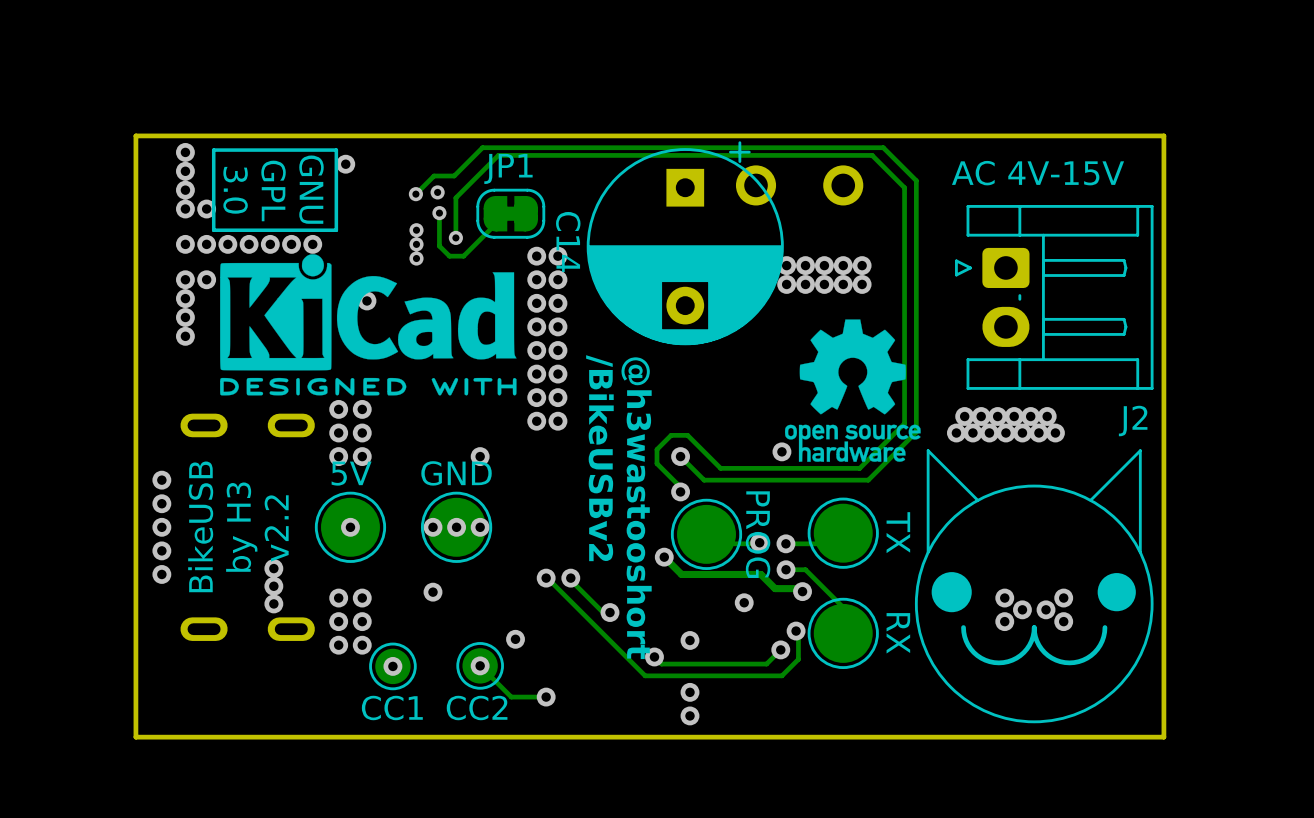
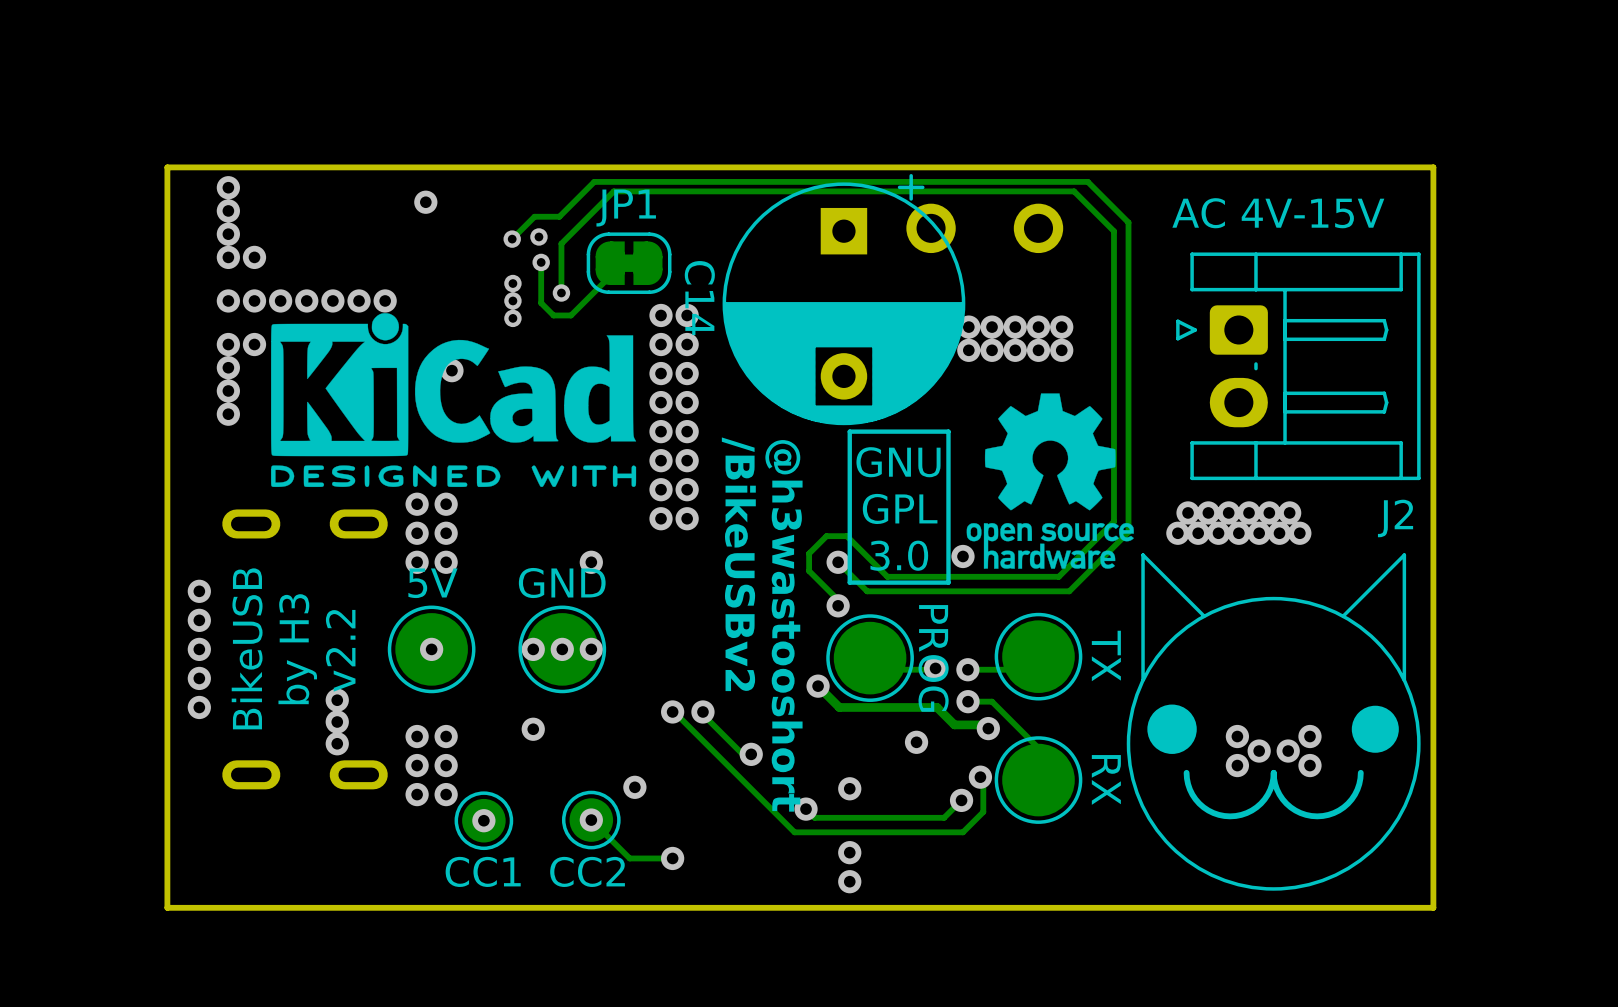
line: (336, 150) (213, 150) (213, 230) (336, 230) (336, 150) -> none
text rotation: 0° (311, 189) -> 90° counterclockwise (898, 462)
text position: GNU (311, 189) -> GNU (898, 462)
text rotation: 0° (235, 190) -> 90° counterclockwise (899, 555)
text position: 3.0 (235, 190) -> 3.0 (899, 555)
text rotation: 0° (273, 190) -> 90° counterclockwise (900, 508)
text position: GPL (273, 190) -> GPL (900, 508)
line: none -> (948, 431) (849, 431) (849, 582) (948, 582) (948, 431)

